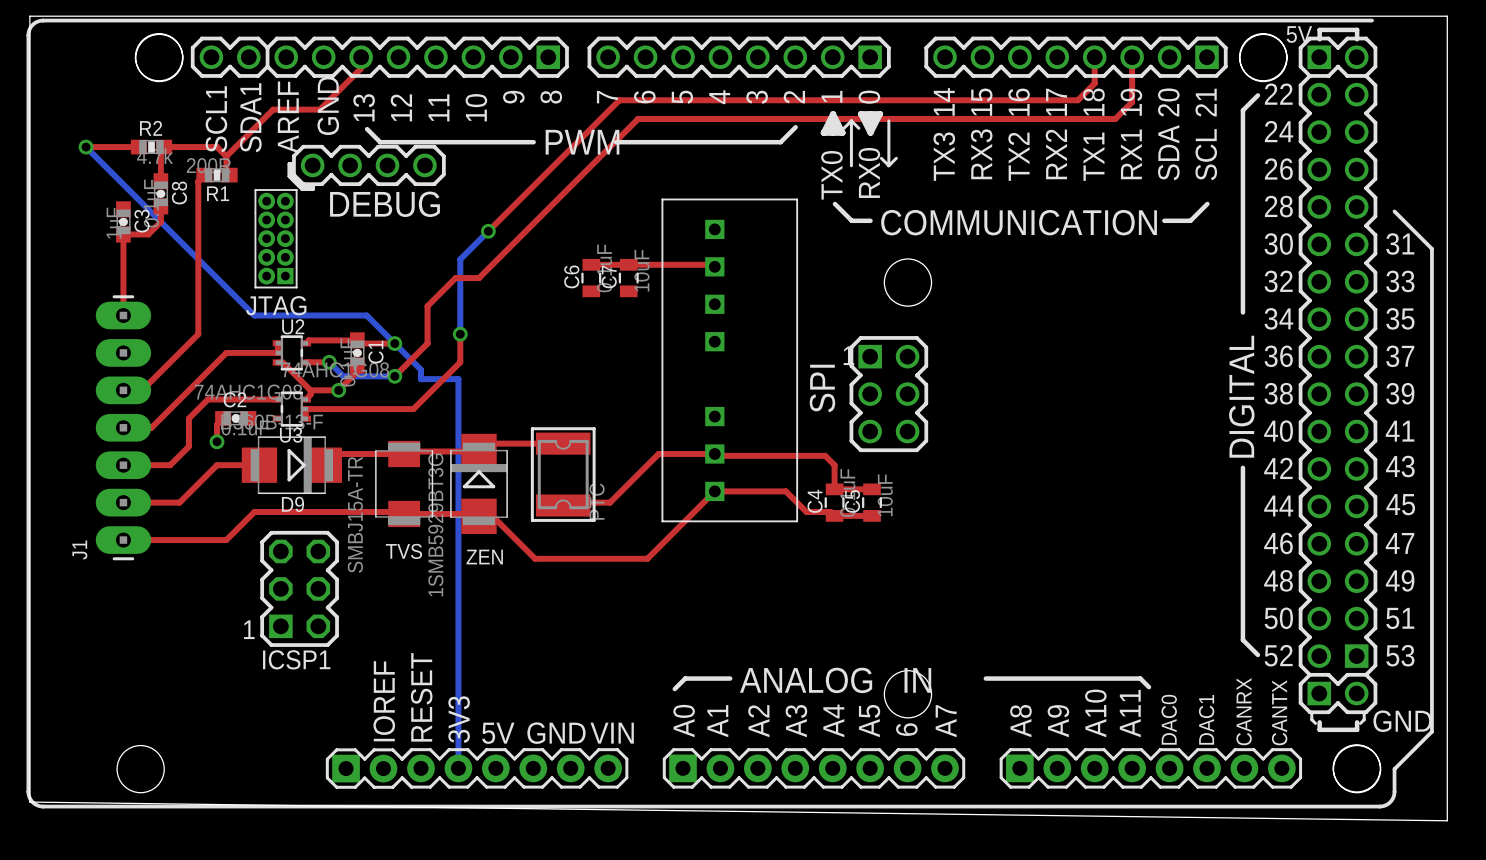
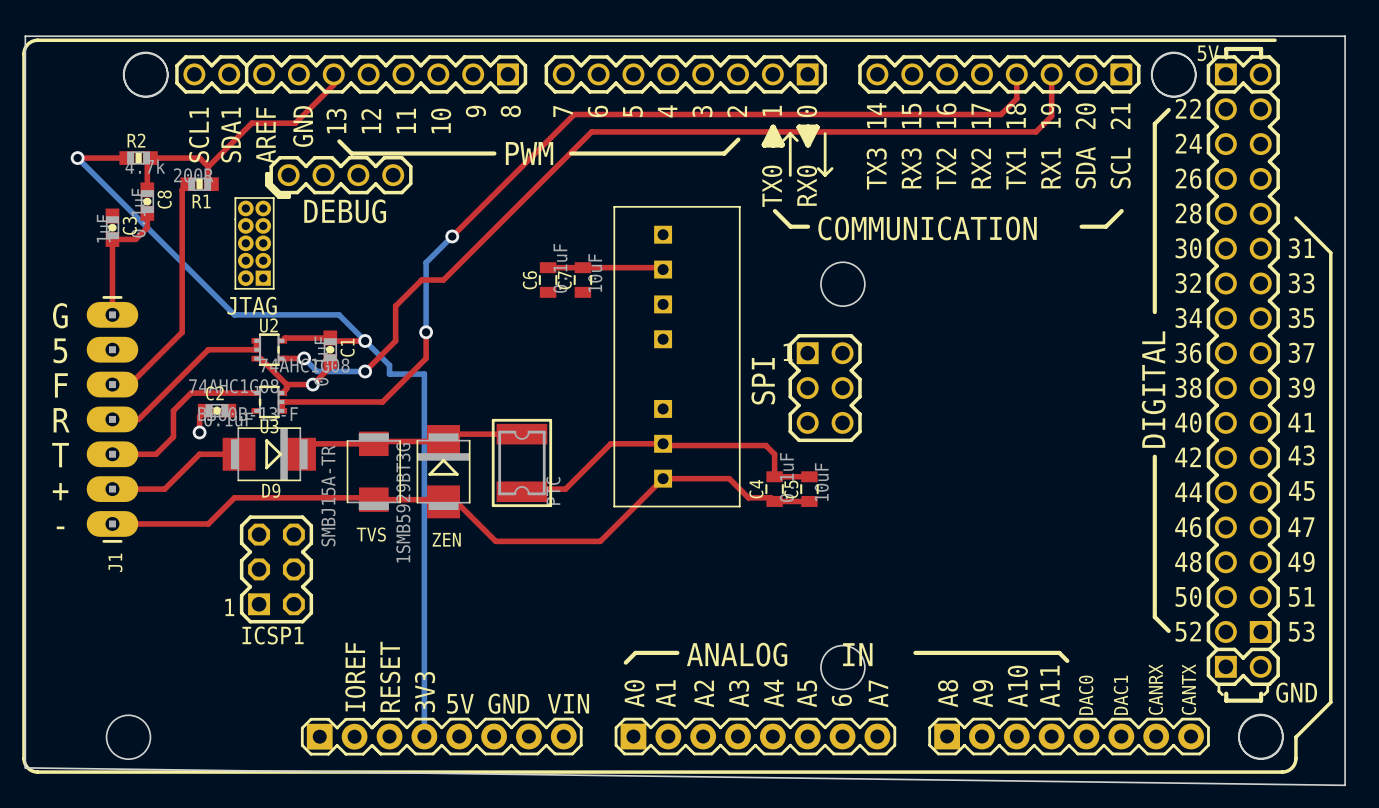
text: none -> G (60, 315)
text: none -> 5 (60, 350)
text: none -> F (61, 385)
text: none -> R (61, 420)
text: none -> T (60, 455)
text: none -> + (60, 491)
text: none -> - (60, 527)
J1 name position: J1 (79, 550) -> J1 (115, 562)

